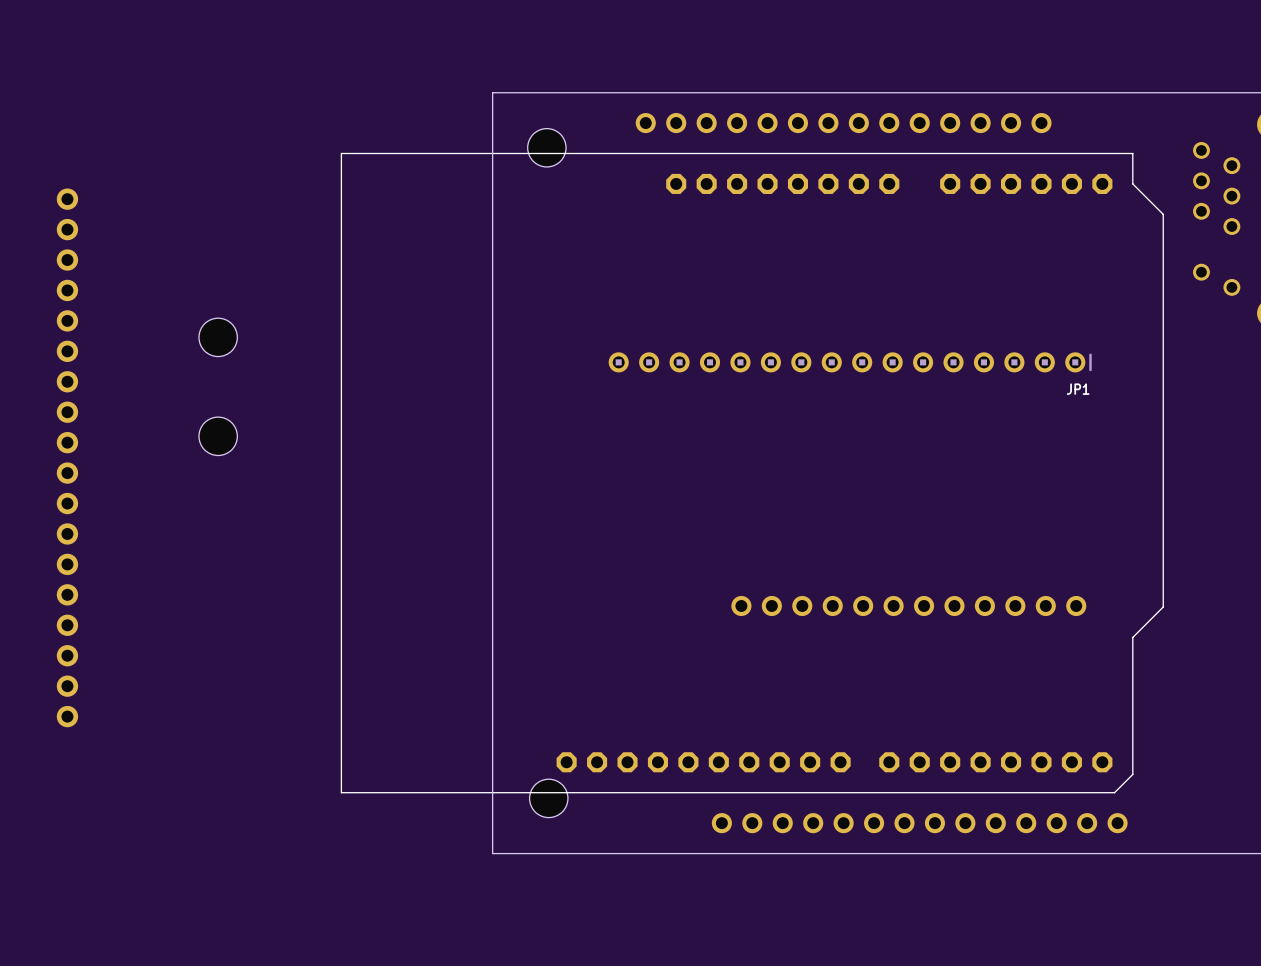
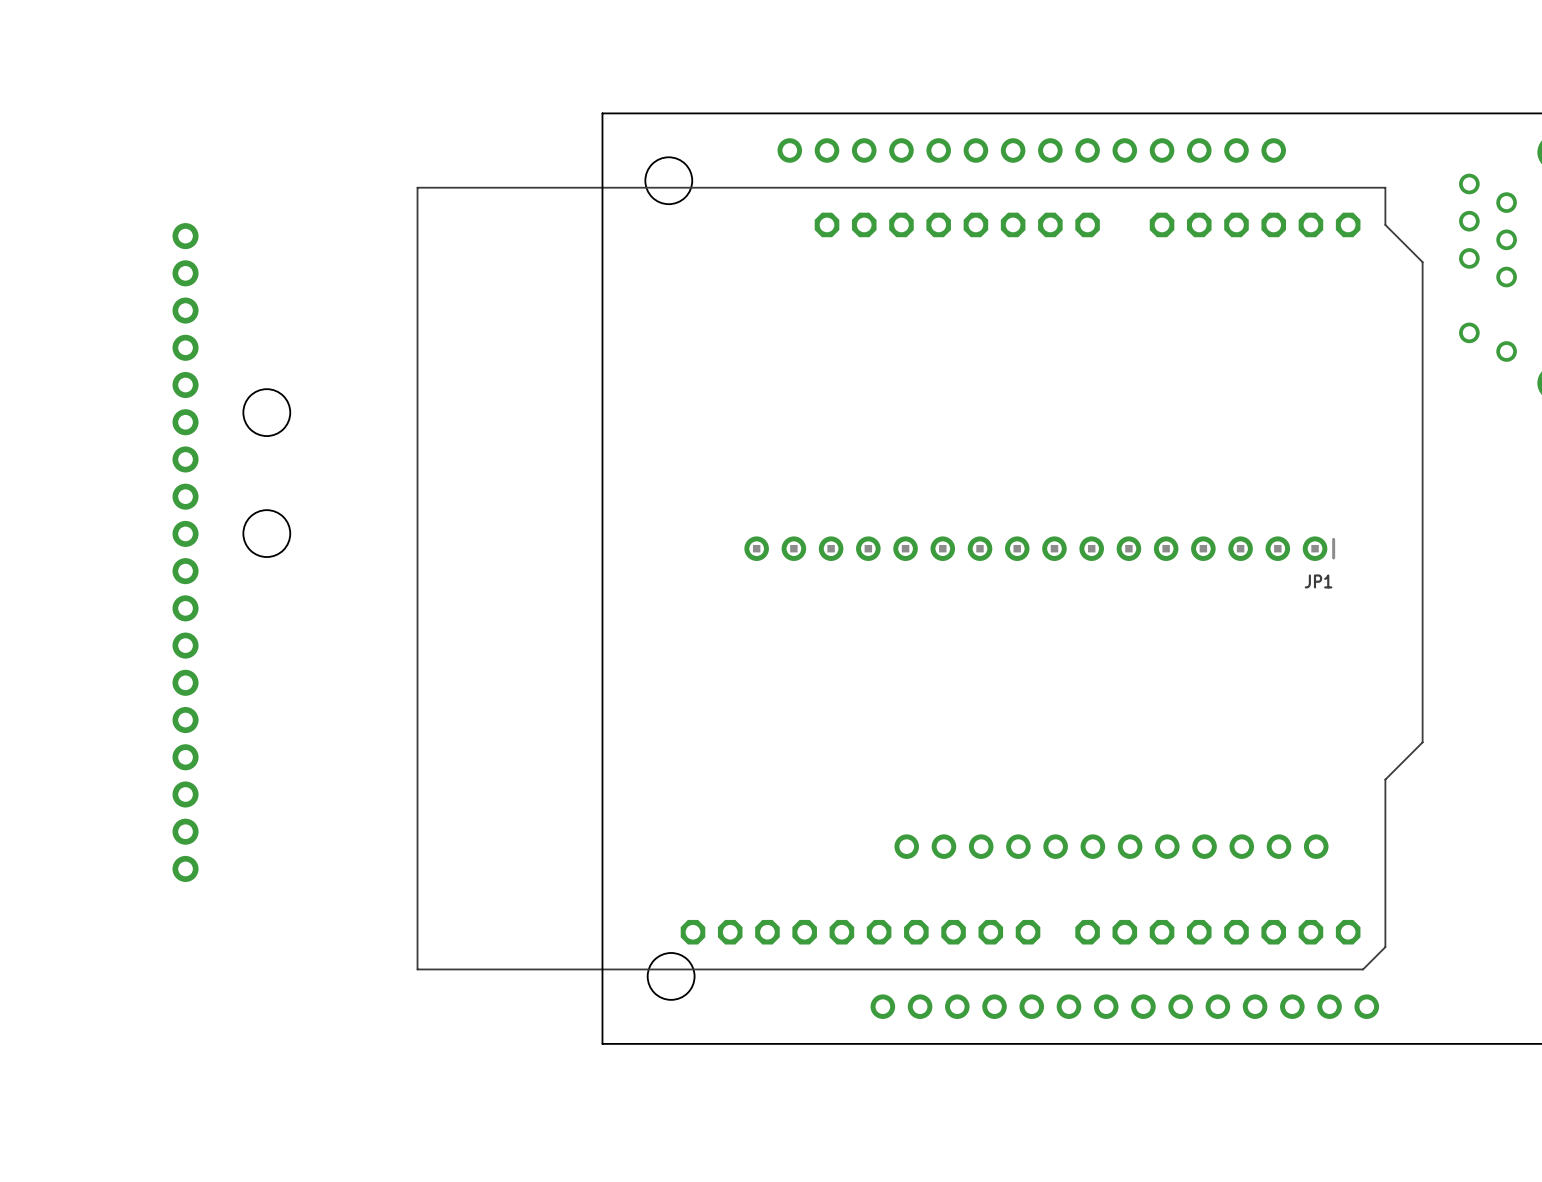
JP1 position: (850, 362) -> (1039, 548)
part position: (67, 457) -> (185, 552)
part position: (908, 605) -> (1111, 846)

